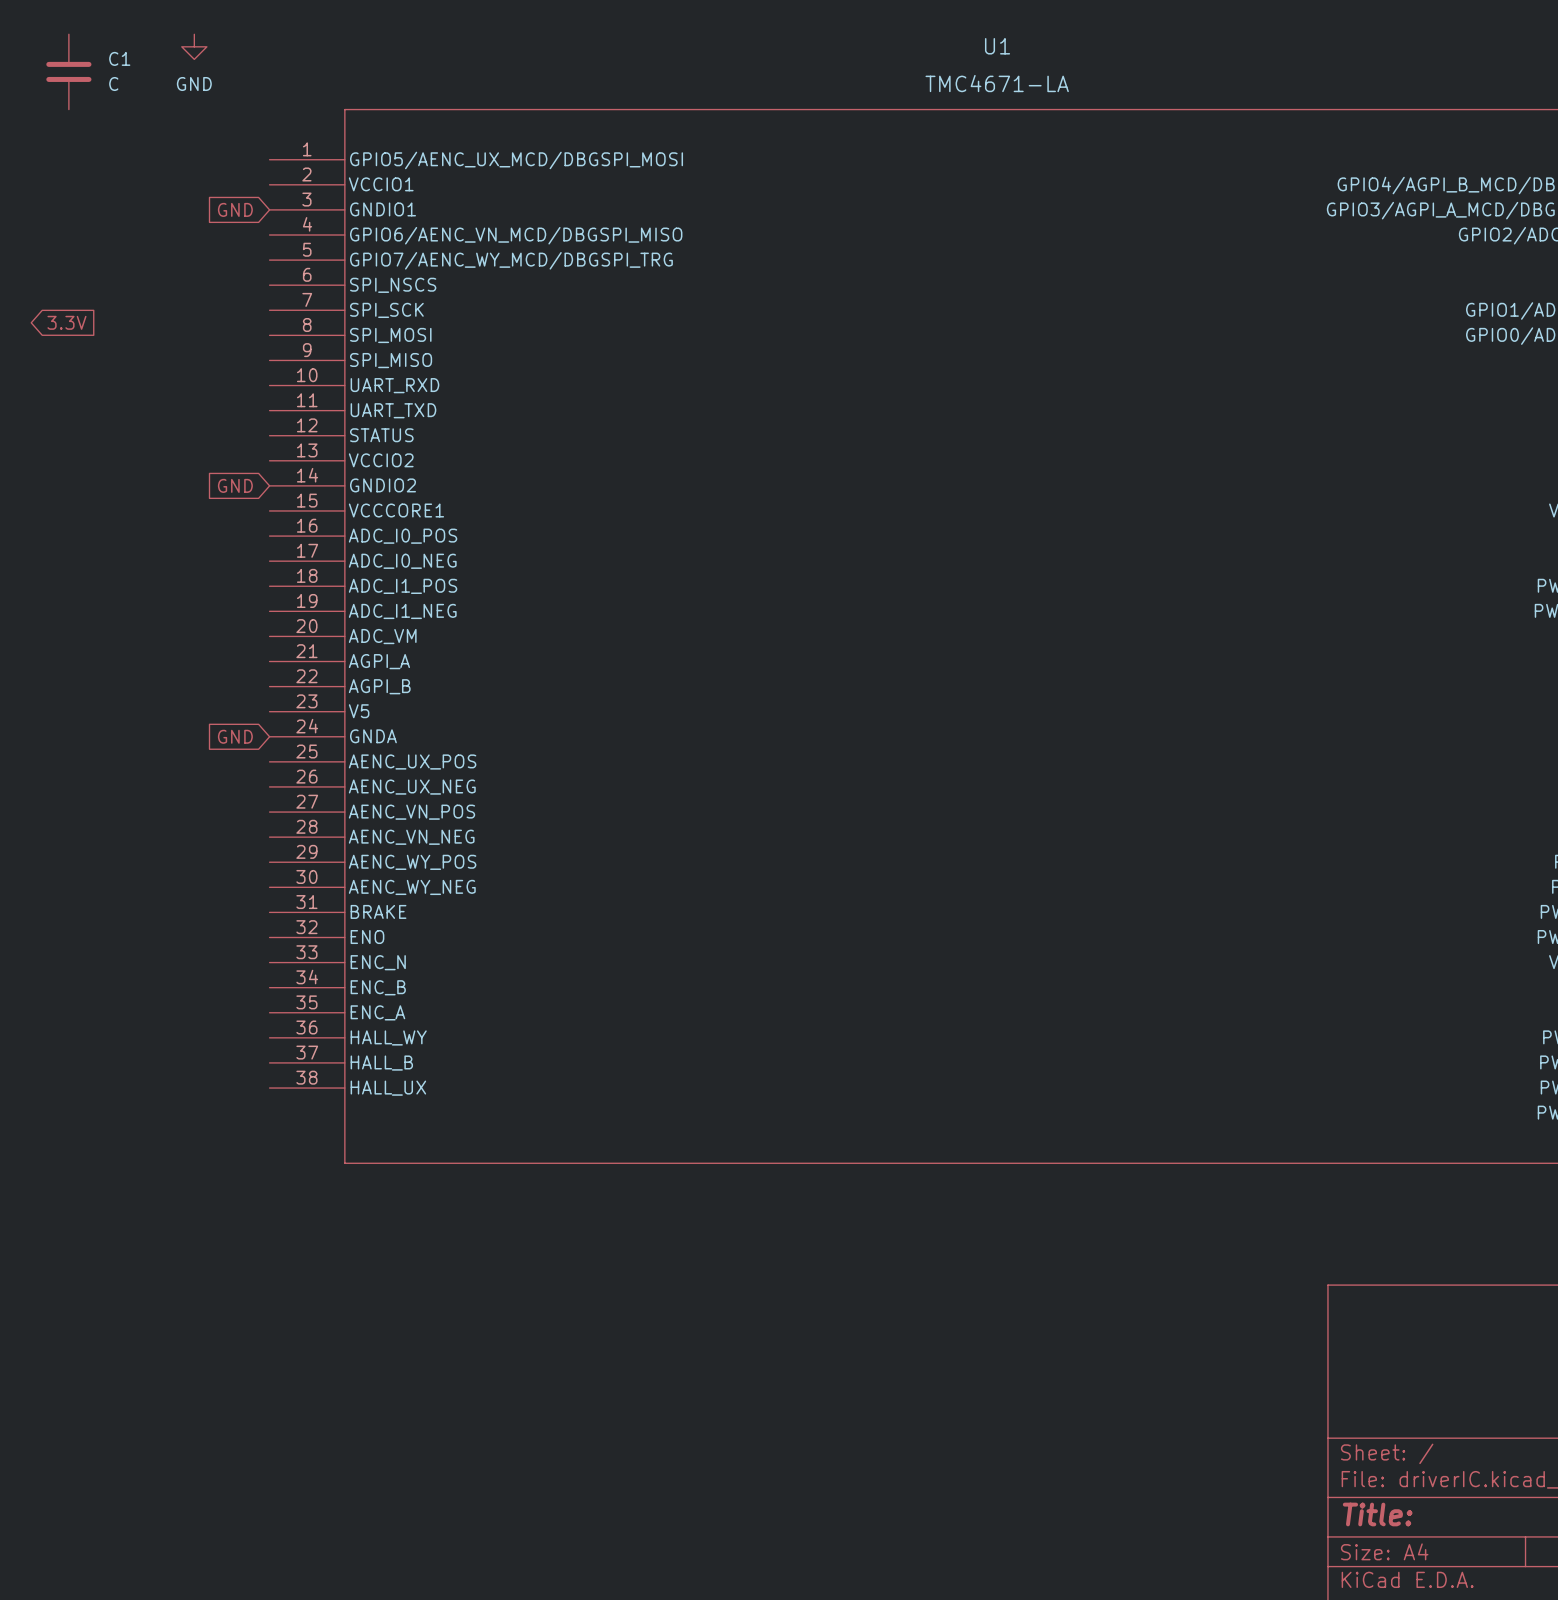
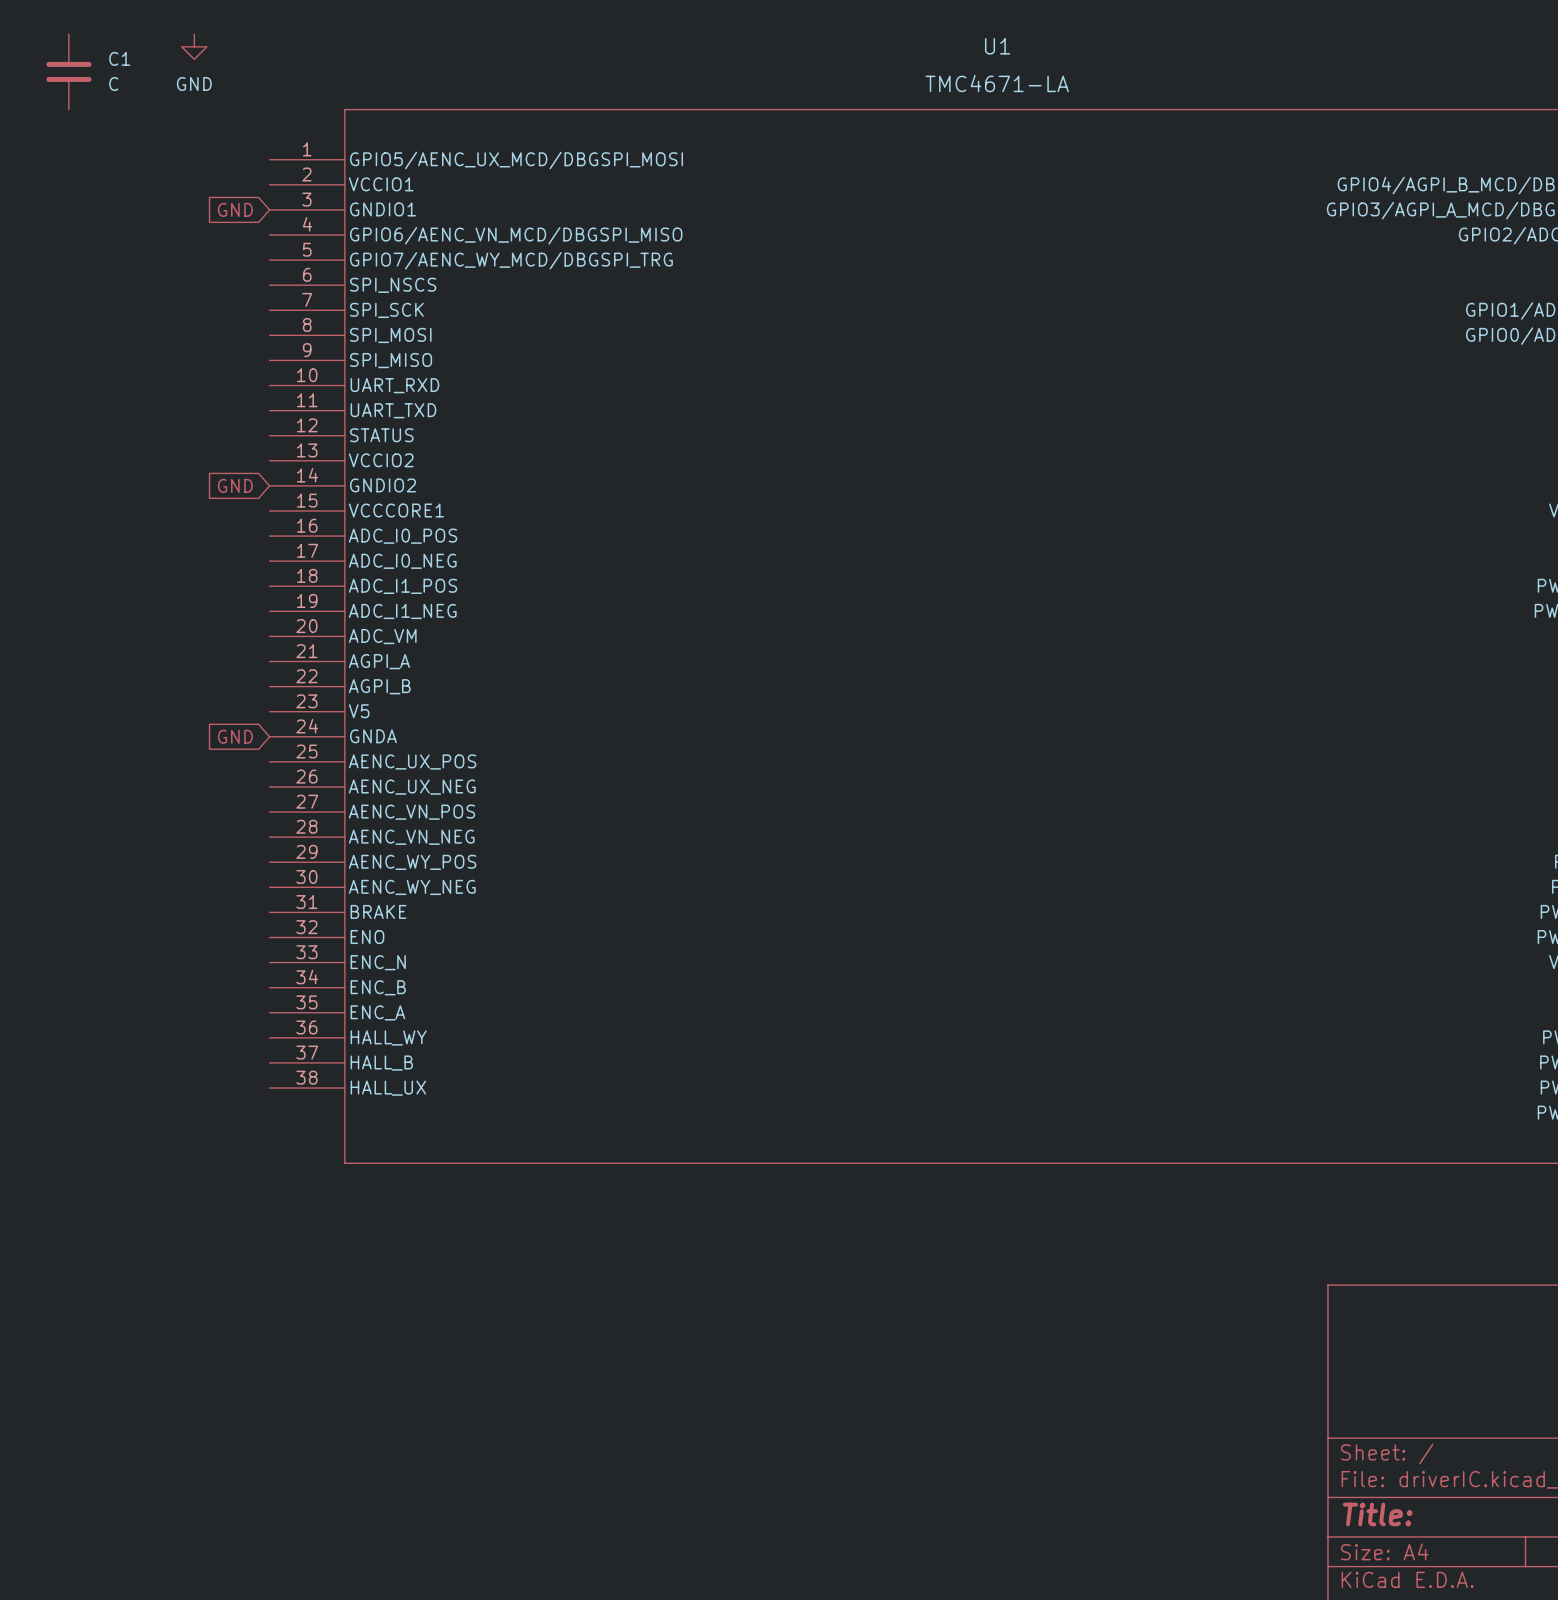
global label: 3.3V (66, 322) -> none

